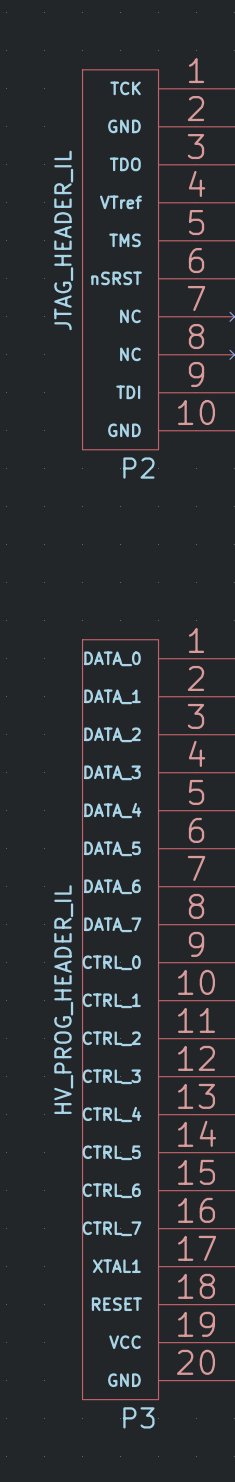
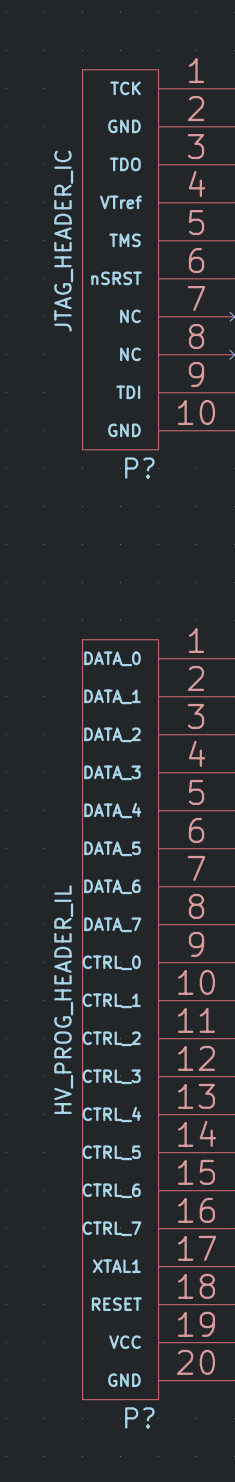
P2 value: JTAG_HEADER_IL (63, 240) -> JTAG_HEADER_IC (63, 241)
P2 name: P2 (138, 468) -> P? (139, 468)
P3 name: P3 (138, 1417) -> P? (139, 1417)

